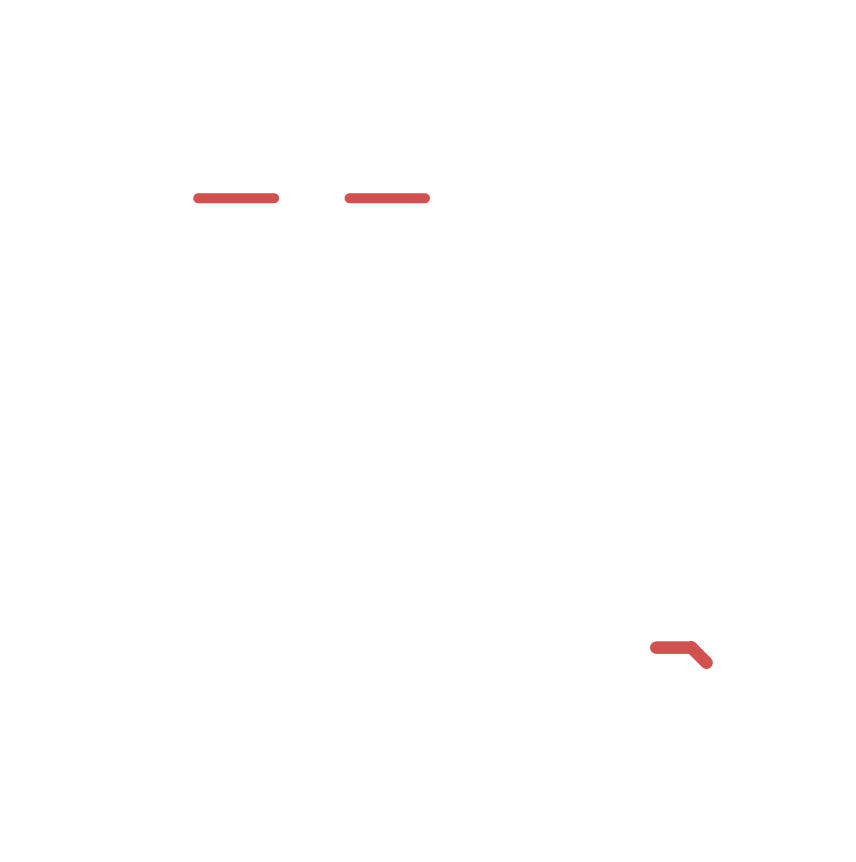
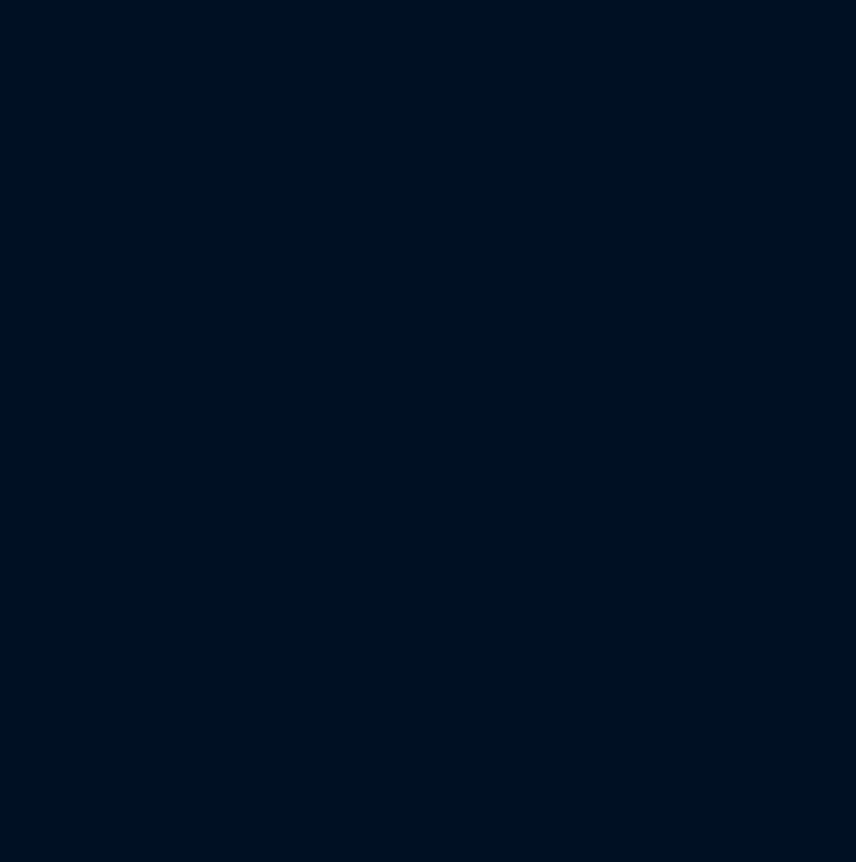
track: (198, 198) (274, 198) -> none
track: (349, 198) (424, 198) -> none
track: (656, 647) (691, 647) (706, 662) -> none

